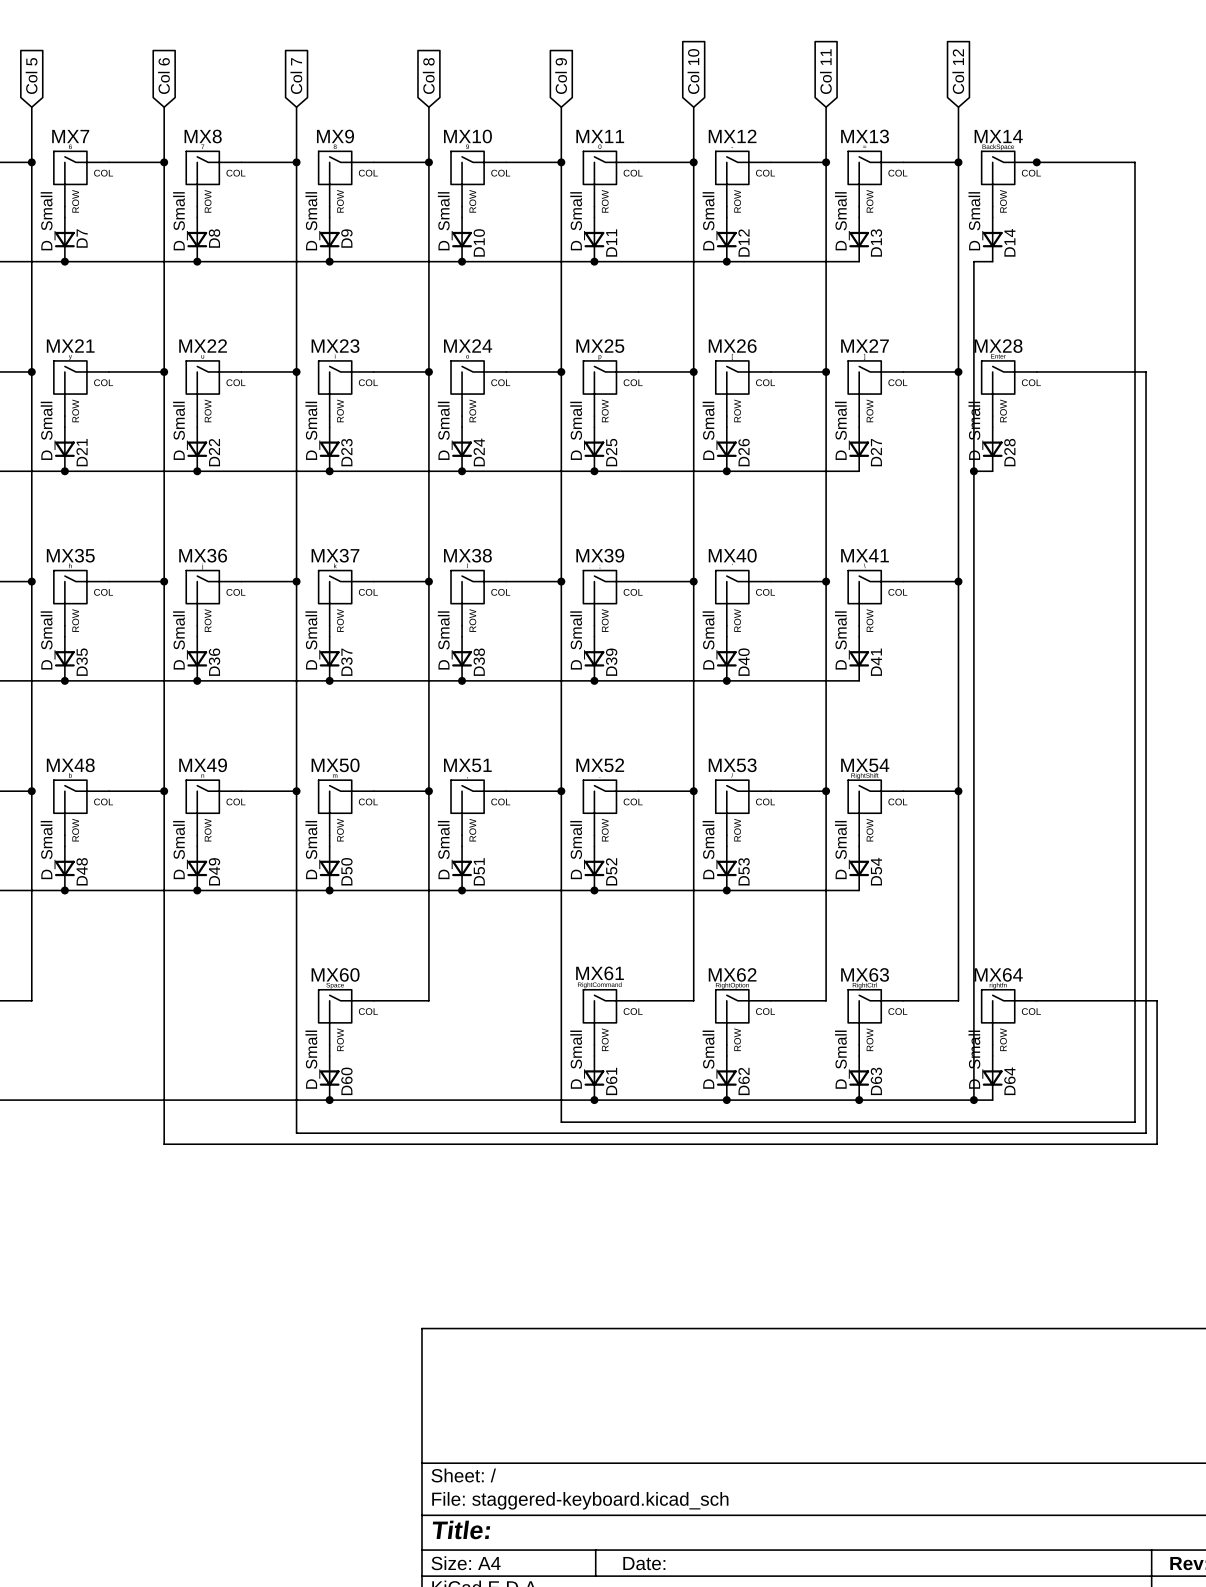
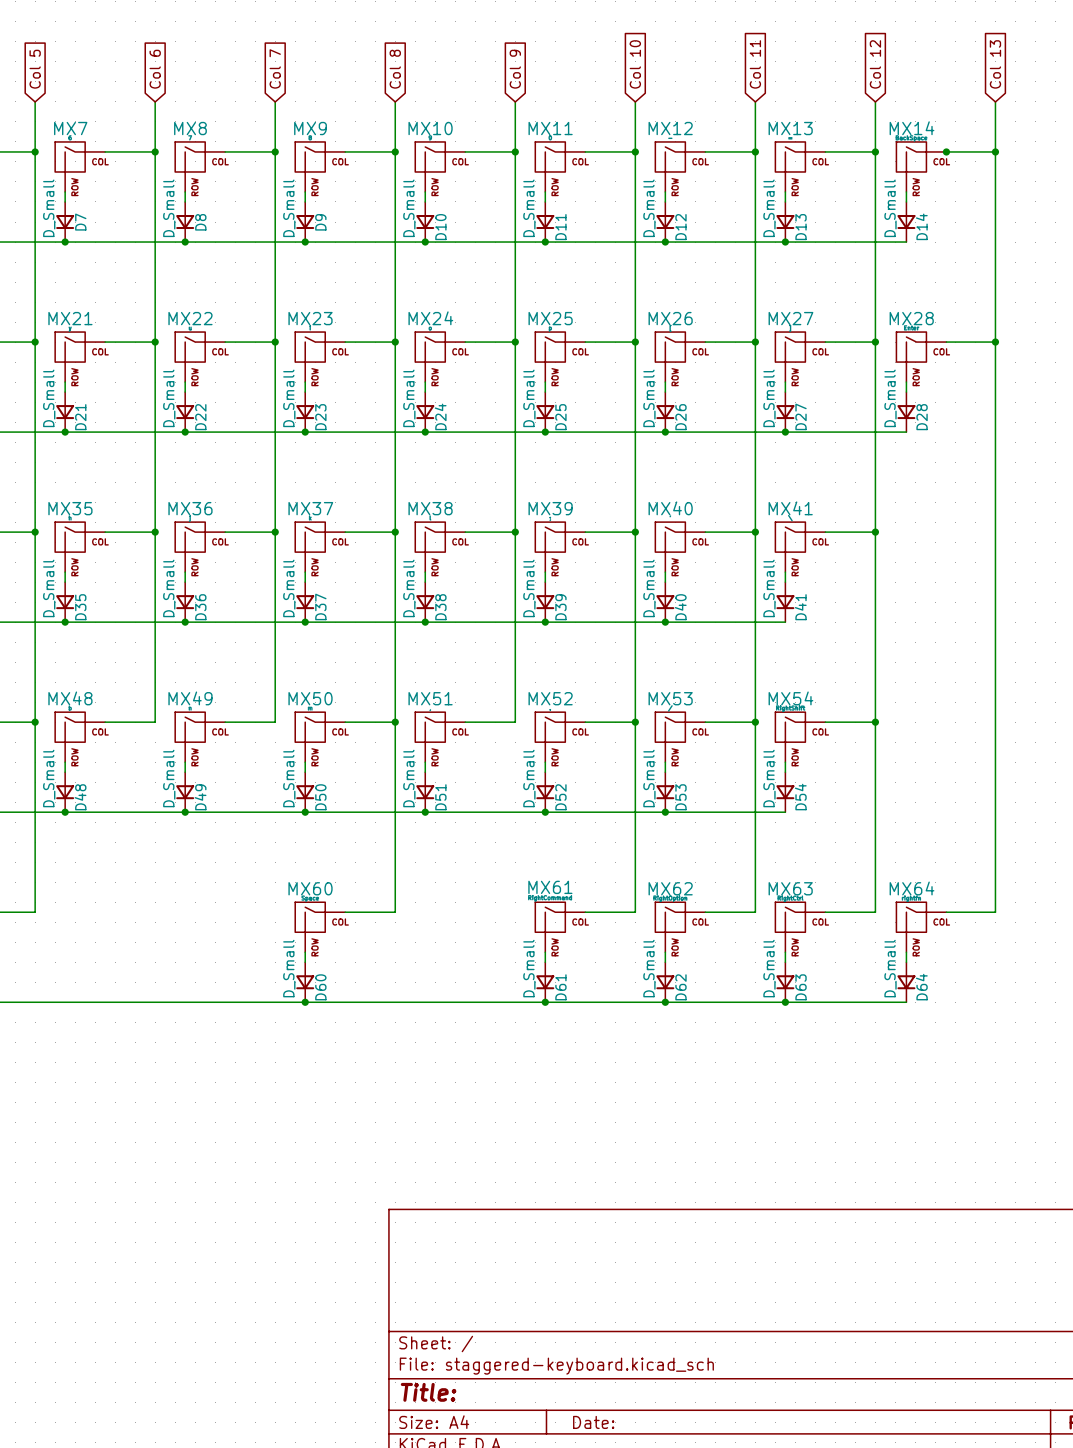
global label: none -> Col 13 (995, 64)
wire: (1090, 162) (1134, 162) (1134, 1122) (561, 1122) (561, 791) -> none
junction: none -> (995, 151)
junction: none -> (785, 242)
wire: (973, 261) (973, 1100) -> (889, 242) (785, 242)
wire: (1090, 371) (1146, 371) (1146, 1133) (296, 1133) (296, 791) -> none
junction: none -> (995, 342)
wire: none -> (785, 432) (889, 432)
junction: none -> (785, 432)
junction: (973, 471) -> none
wire: (164, 791) (164, 1144) (1157, 1144) (1157, 1000) (1090, 1000) -> (995, 101) (995, 912)
junction: (164, 791) -> none
junction: (296, 791) -> none
junction: (561, 791) -> none
junction: (973, 1100) -> none

